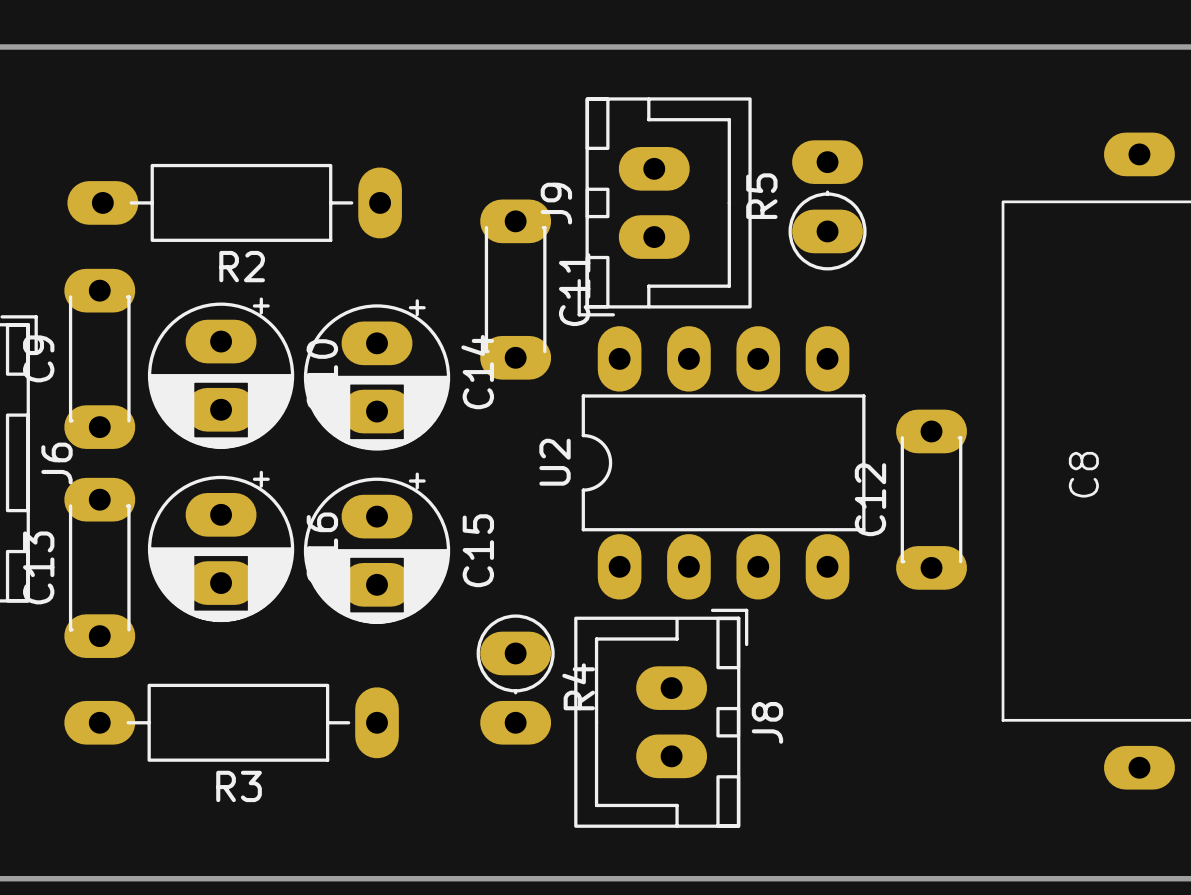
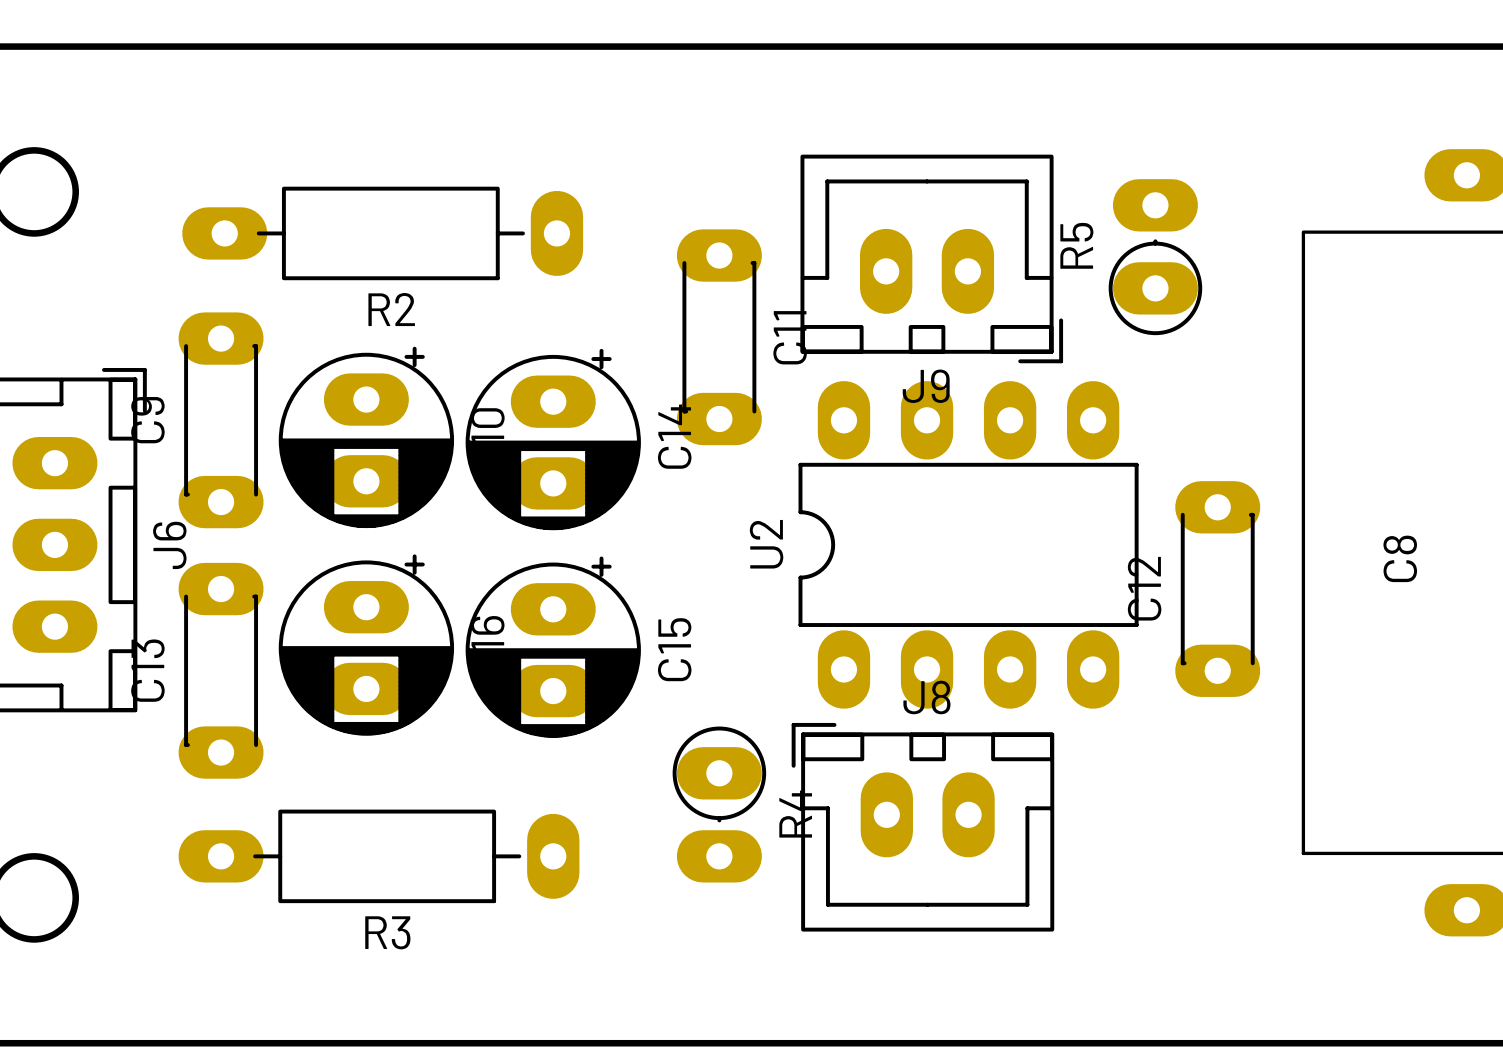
R5 position: (827, 205) -> (1155, 257)
J9 rotation: 0° (664, 206) -> 90° counterclockwise (931, 258)
J8 rotation: 0° (661, 718) -> 90° counterclockwise (922, 827)

